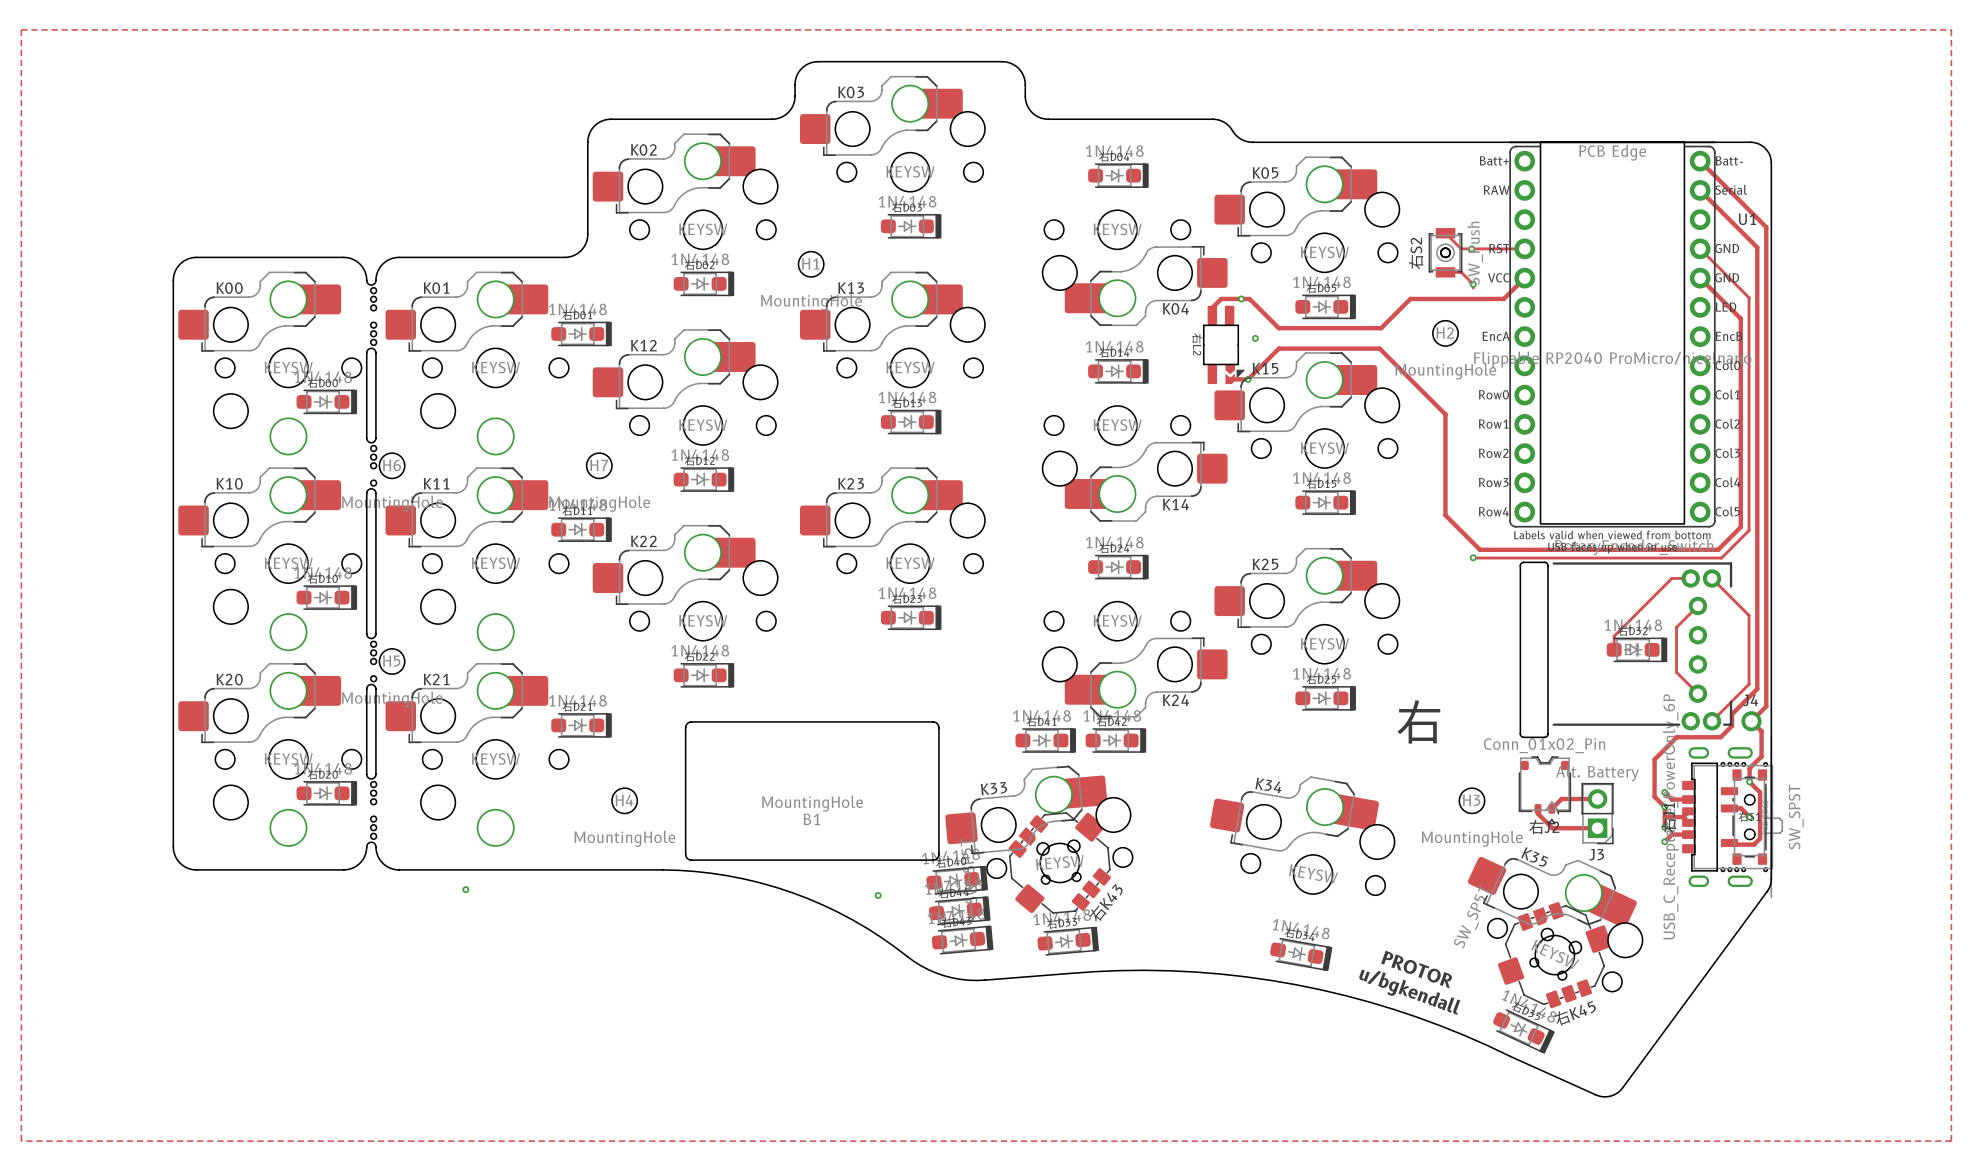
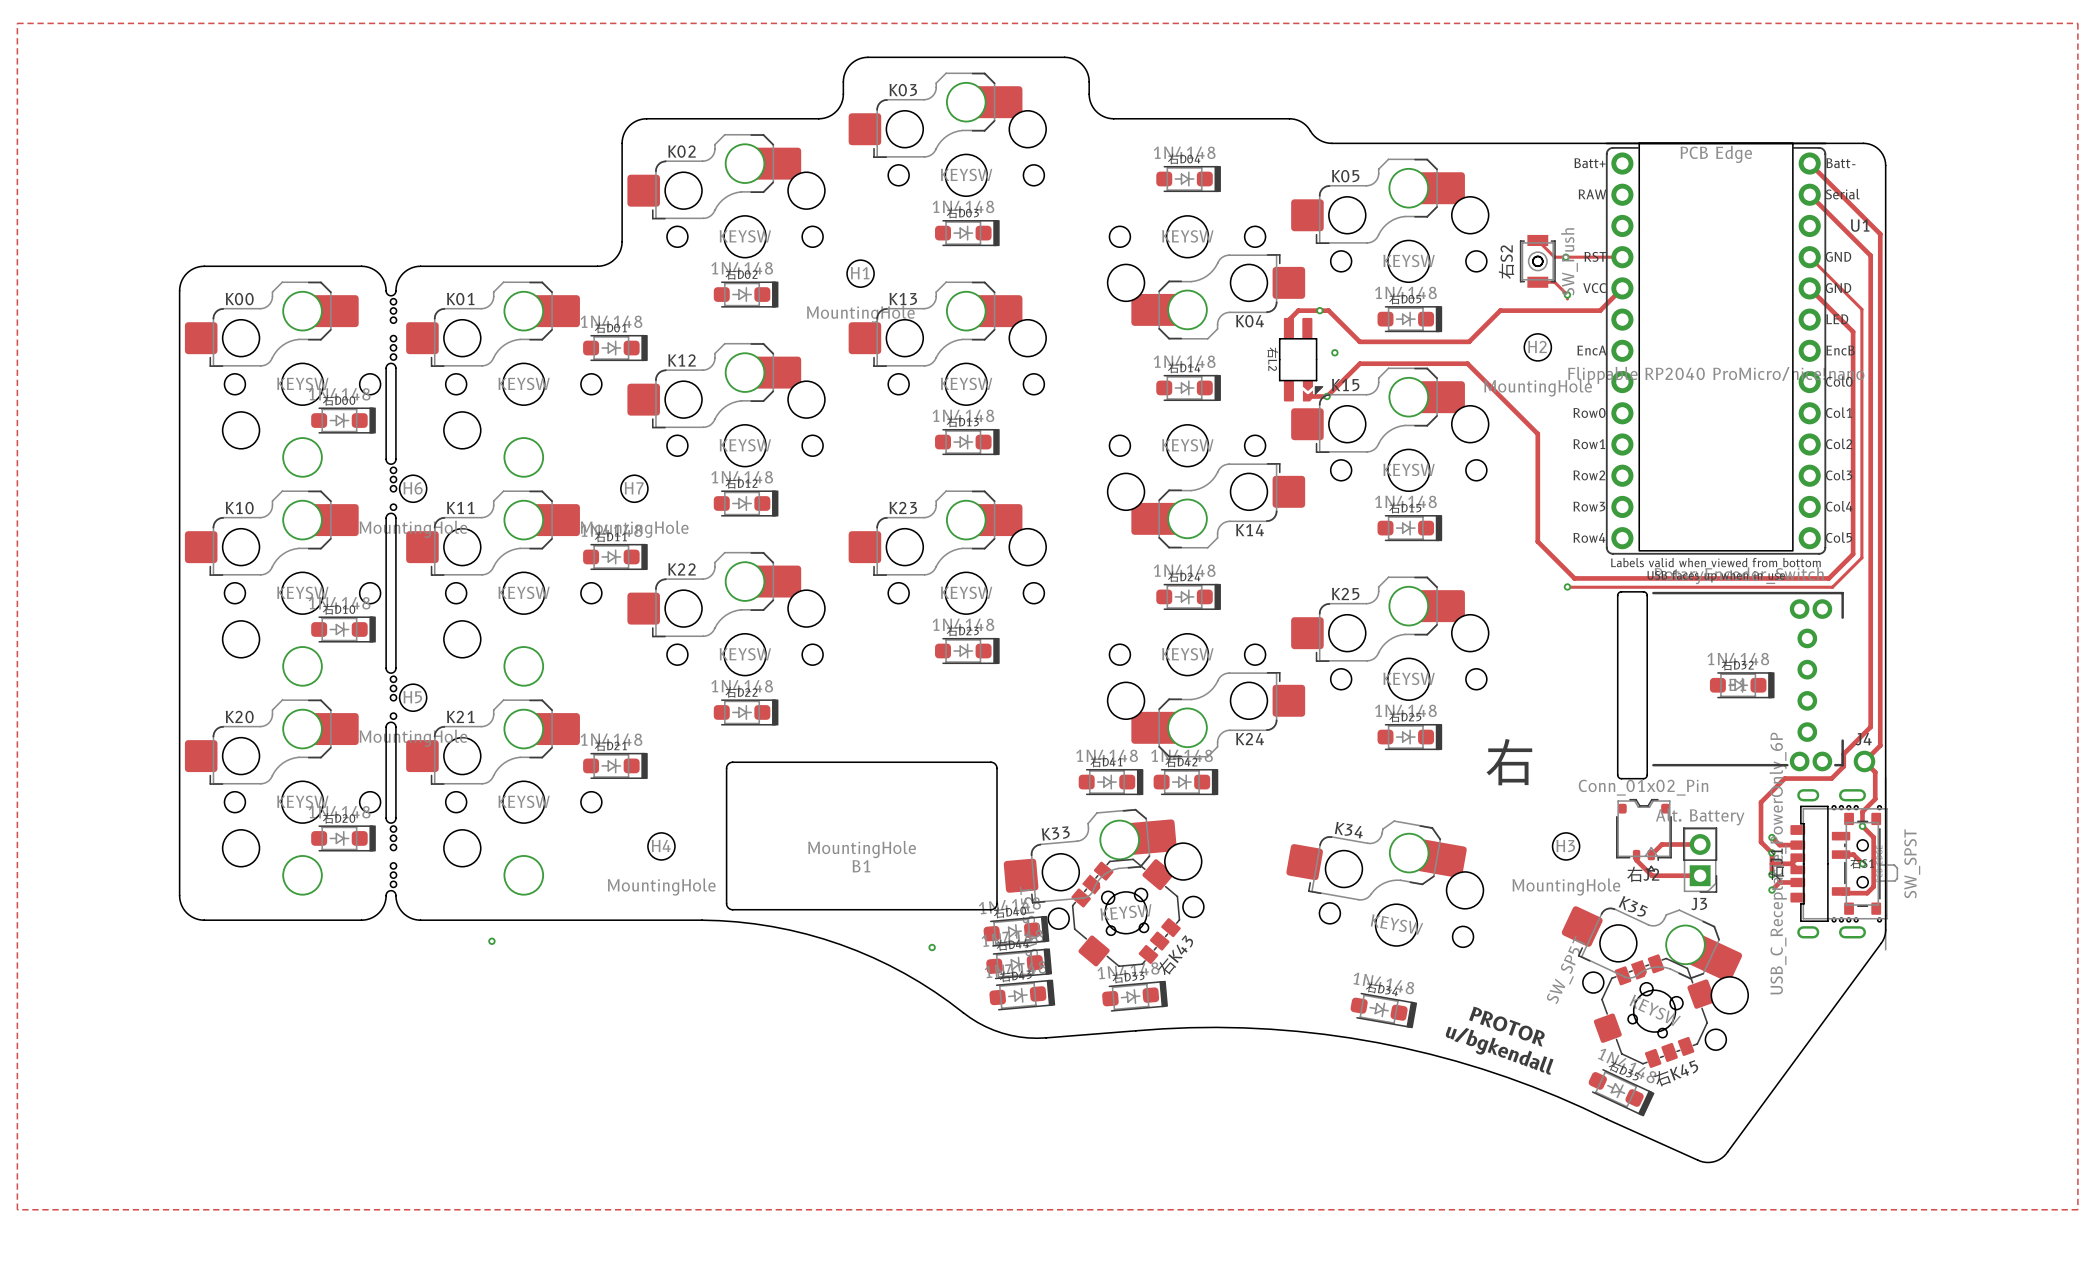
track: (1690, 578) (1671, 578) (1614, 636) (1614, 649) -> none
track: (1712, 578) (1749, 615) (1749, 684) (1712, 721) -> none
track: (1697, 605) (1676, 627) (1676, 672) (1697, 693) -> none

